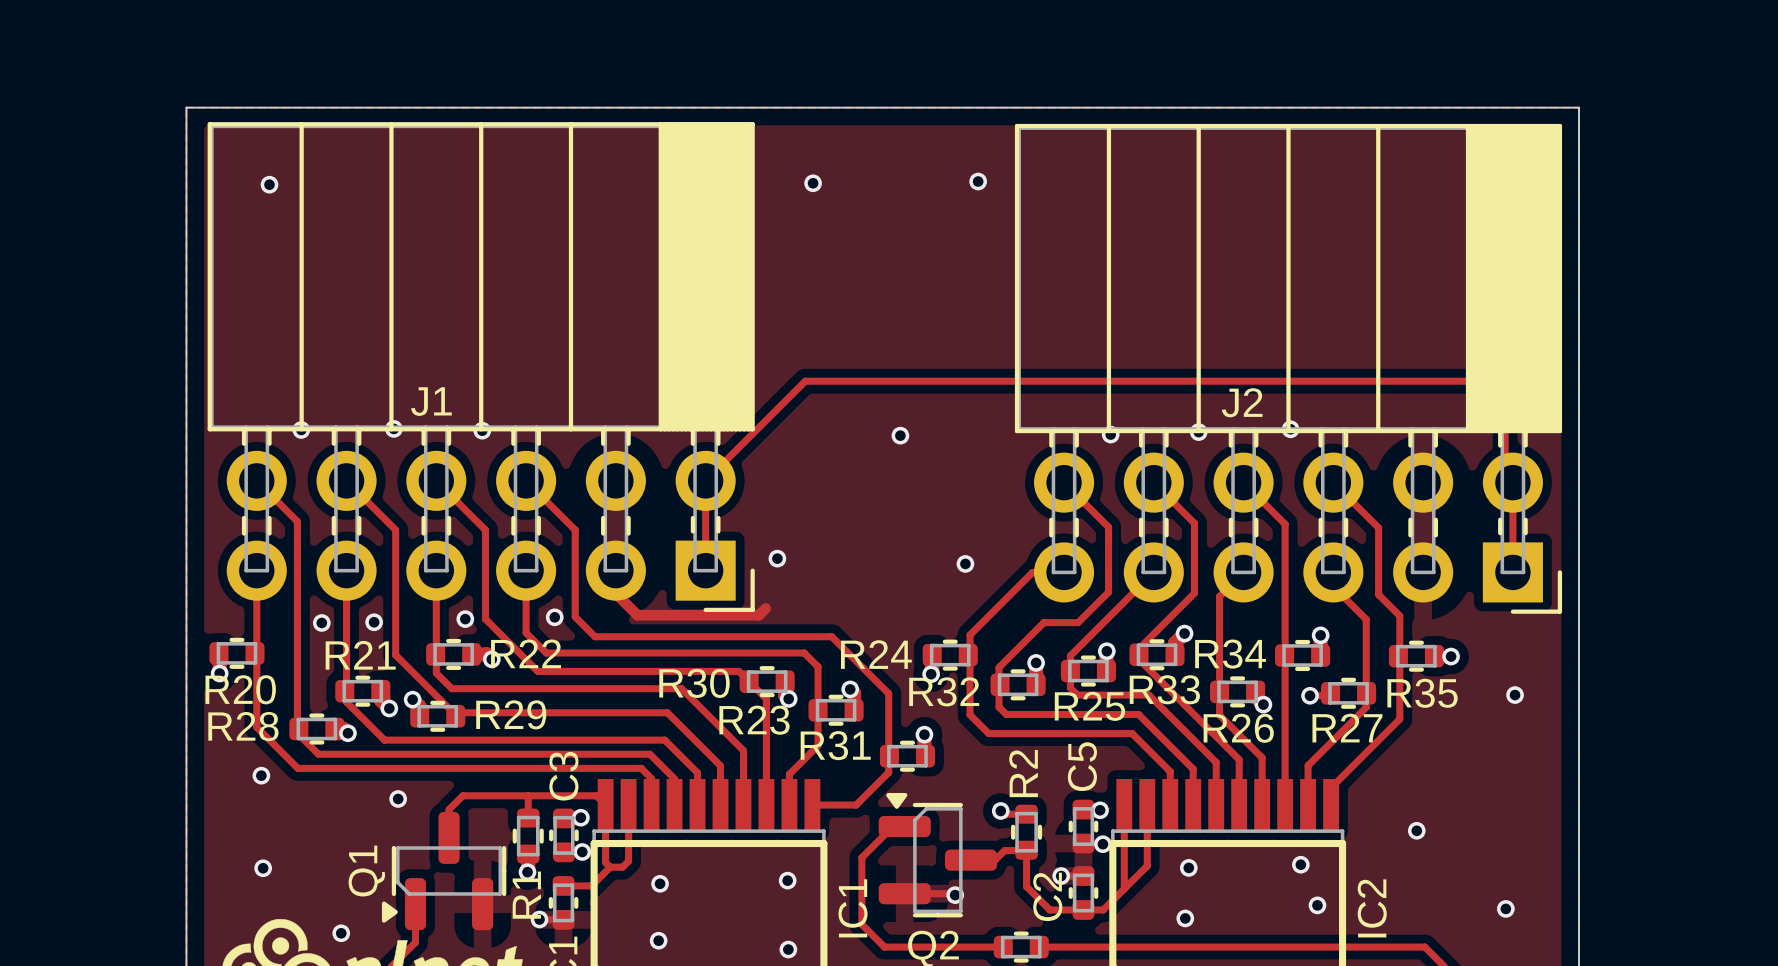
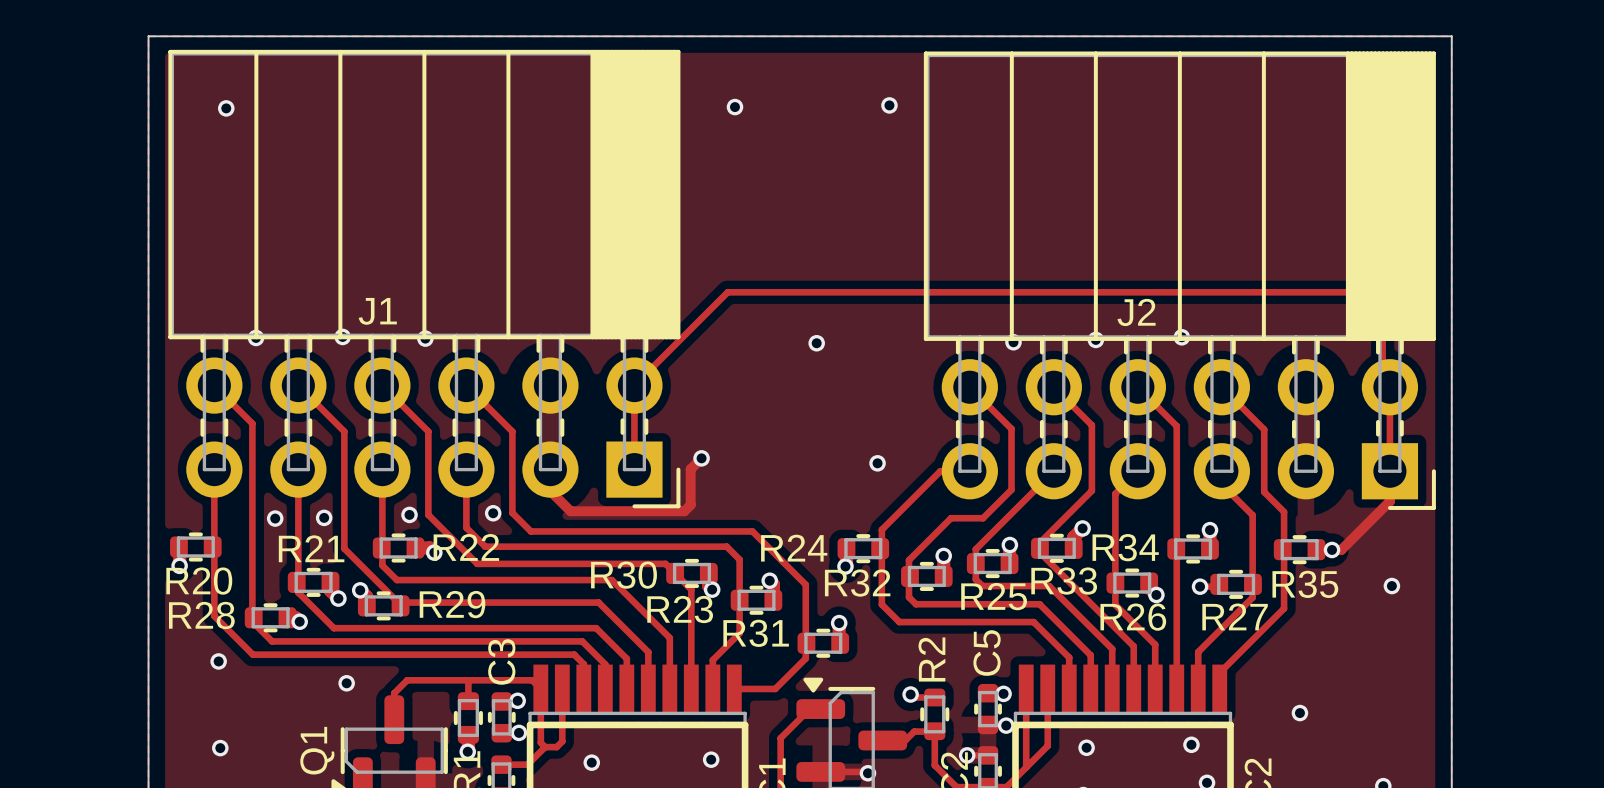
track: none -> (701, 458) (690, 469) (690, 504)
track: none -> (1389, 471) (1389, 501) (1341, 549) (1332, 549)

